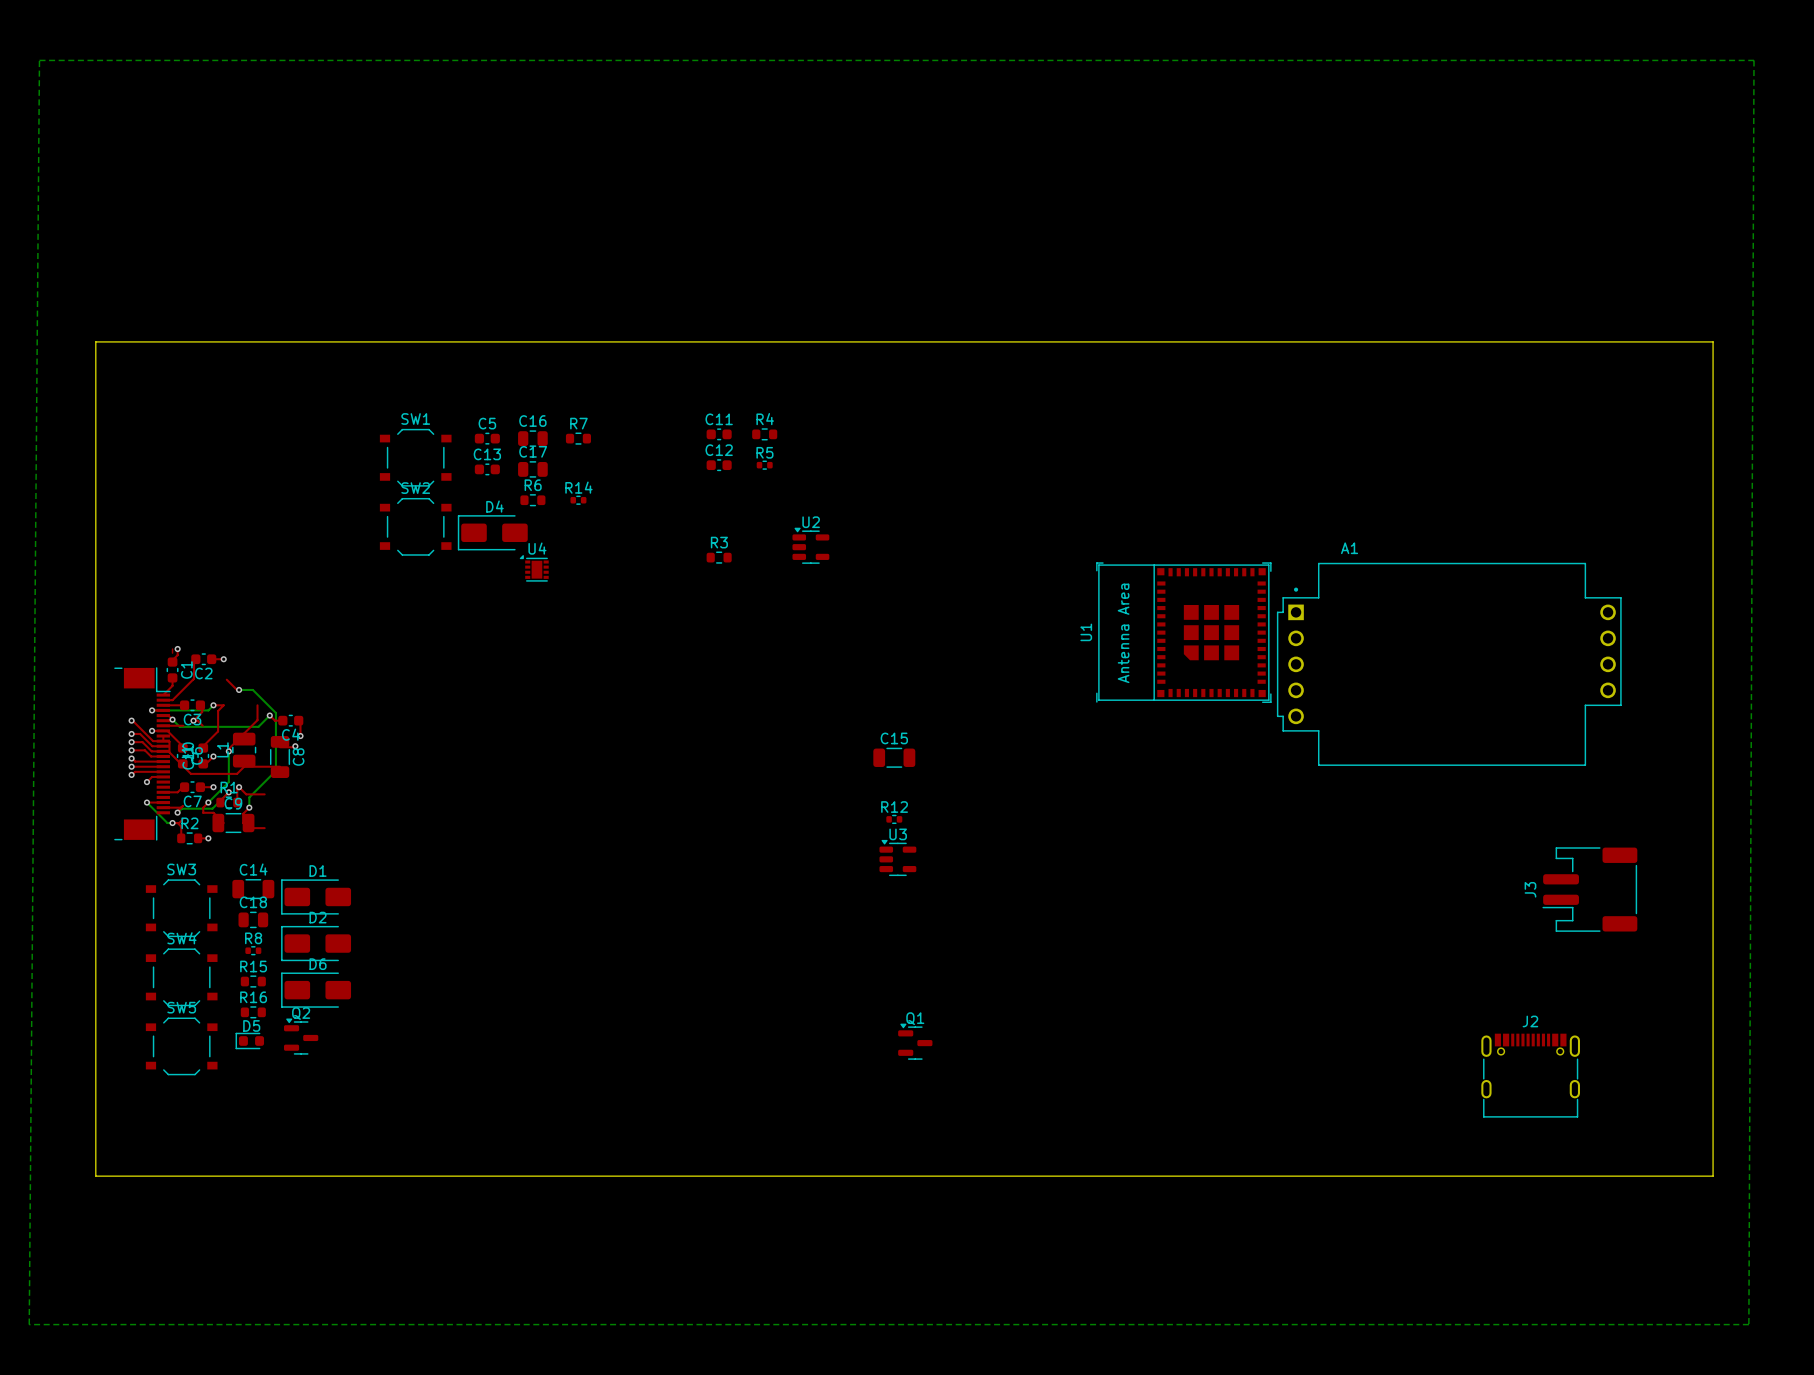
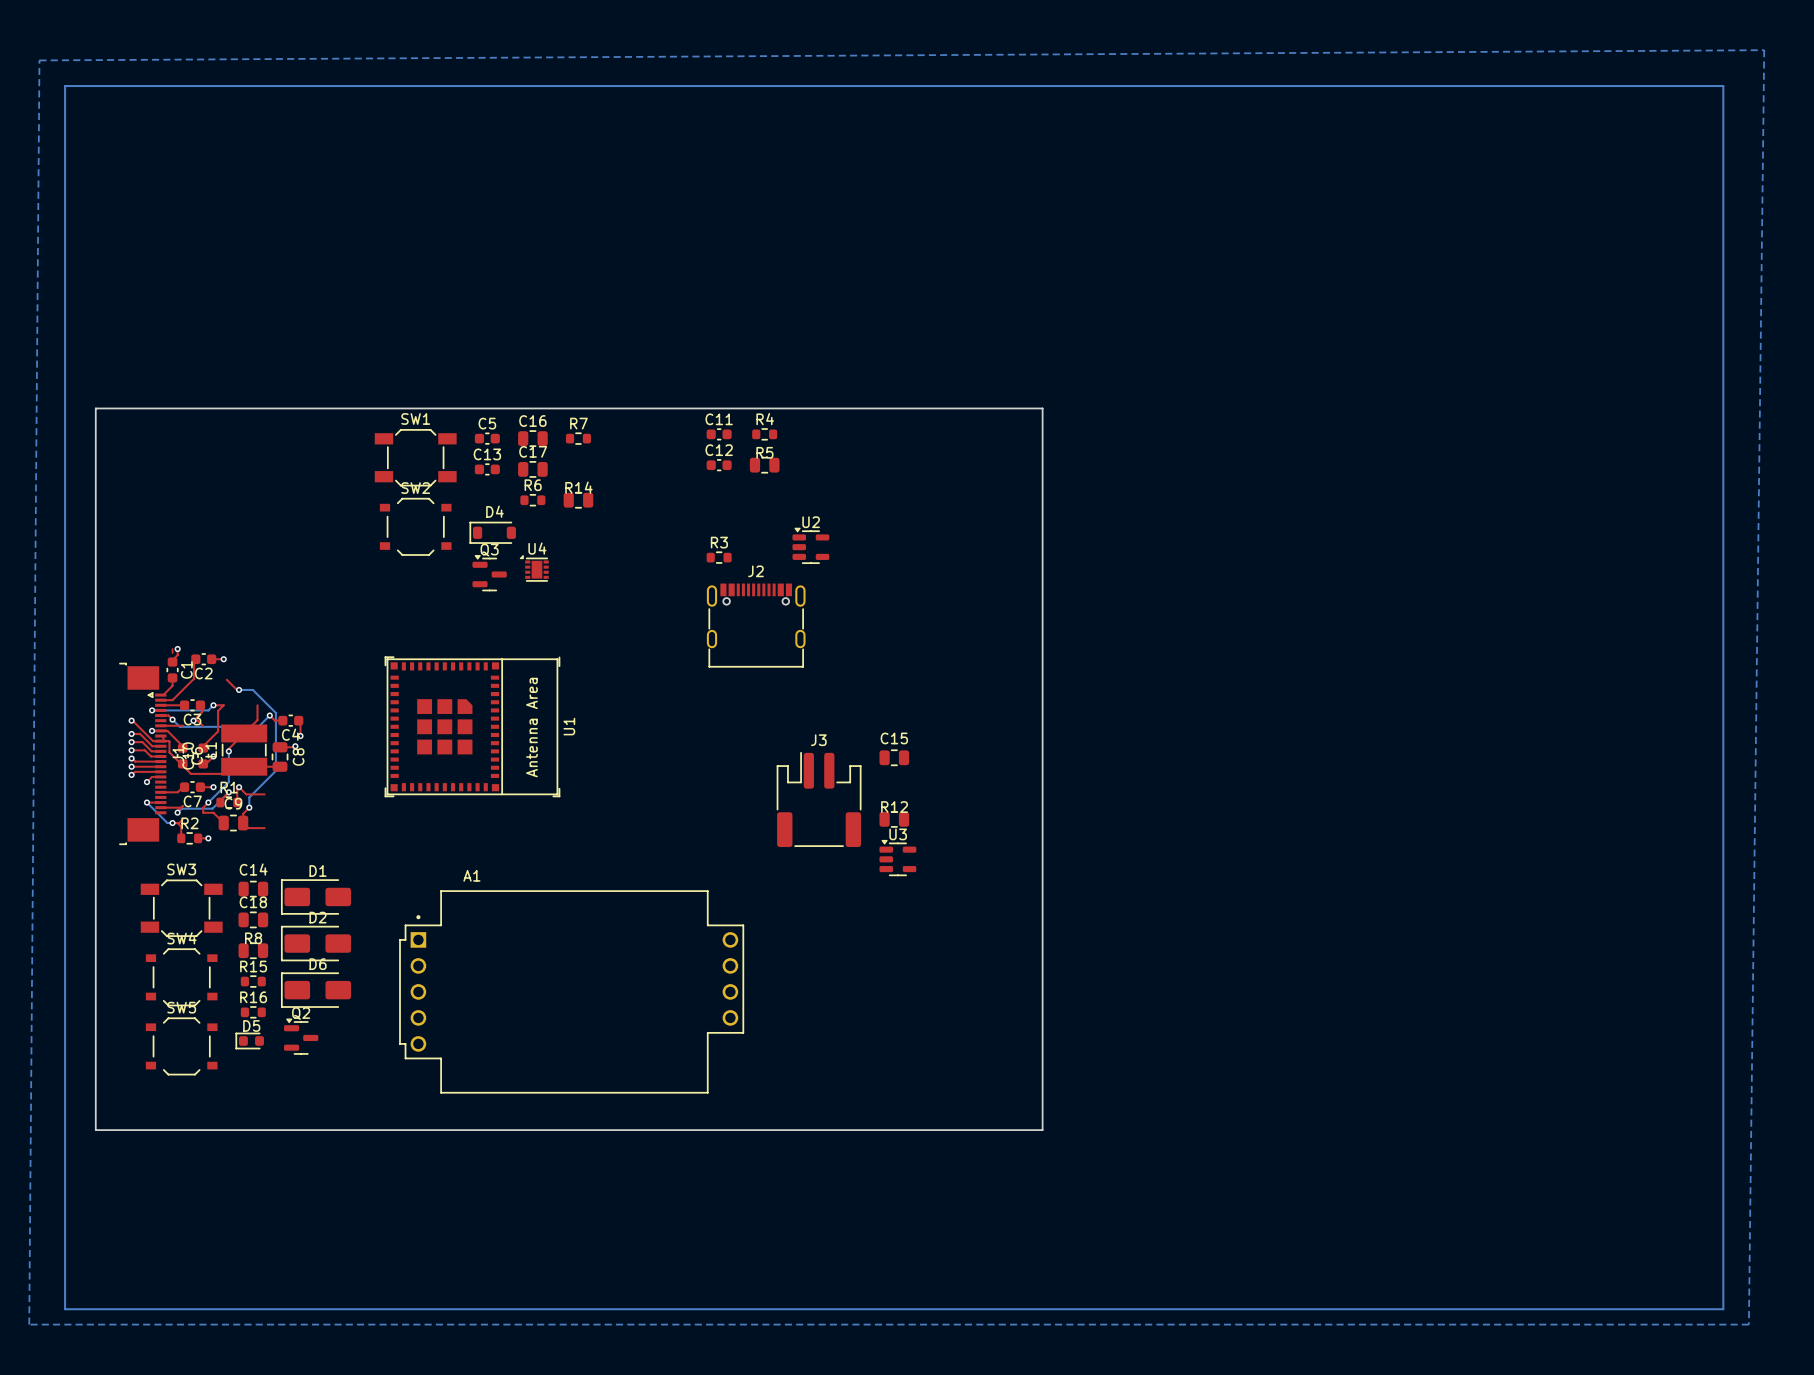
bottom zone outline: (39, 60) (1754, 60) (1748, 1324) -> (39, 60) (1764, 50) (1748, 1324)
bottom track: none -> (65, 86) (1723, 86) (1723, 1309) (65, 1309) (65, 86)
board edge: (95, 408) (95, 341) (1713, 341) (1713, 1176) (95, 1176) (95, 1130) -> (95, 408) (1042, 408) (1042, 1130) (95, 1130)
SW1 footprint: [379, 428, 452, 487] -> [374, 429, 457, 487]
R5 footprint: [756, 460, 773, 470] -> [749, 457, 780, 474]
R14 footprint: [570, 495, 587, 505] -> [563, 492, 594, 509]
D4 footprint: [457, 515, 528, 551] -> [469, 521, 516, 544]
Q3: none -> (489, 573)
U1 rotation: 0° (1183, 632) -> 180° (472, 726)
U1 position: (1183, 632) -> (472, 726)
A1 position: (1449, 664) -> (571, 991)
J1 footprint: [114, 667, 171, 841] -> [119, 662, 167, 845]
L1 footprint: [232, 732, 257, 768] -> [221, 724, 268, 776]
C8 footprint: [270, 736, 290, 778] -> [271, 742, 289, 772]
C15 footprint: [873, 747, 916, 768] -> [879, 749, 910, 766]
C9 footprint: [212, 813, 255, 833] -> [218, 814, 249, 832]
R12 footprint: [886, 814, 903, 824] -> [879, 811, 910, 828]
SW3 footprint: [145, 879, 218, 938] -> [140, 879, 223, 937]
C14 footprint: [232, 879, 275, 900] -> [238, 880, 269, 898]
J3 rotation: 0° (1589, 889) -> 90° clockwise (819, 799)
J3 position: (1589, 889) -> (819, 799)
R8 footprint: [245, 946, 262, 956] -> [238, 942, 269, 959]
Q1: (915, 1041) -> none
J2 position: (1530, 1075) -> (756, 625)

